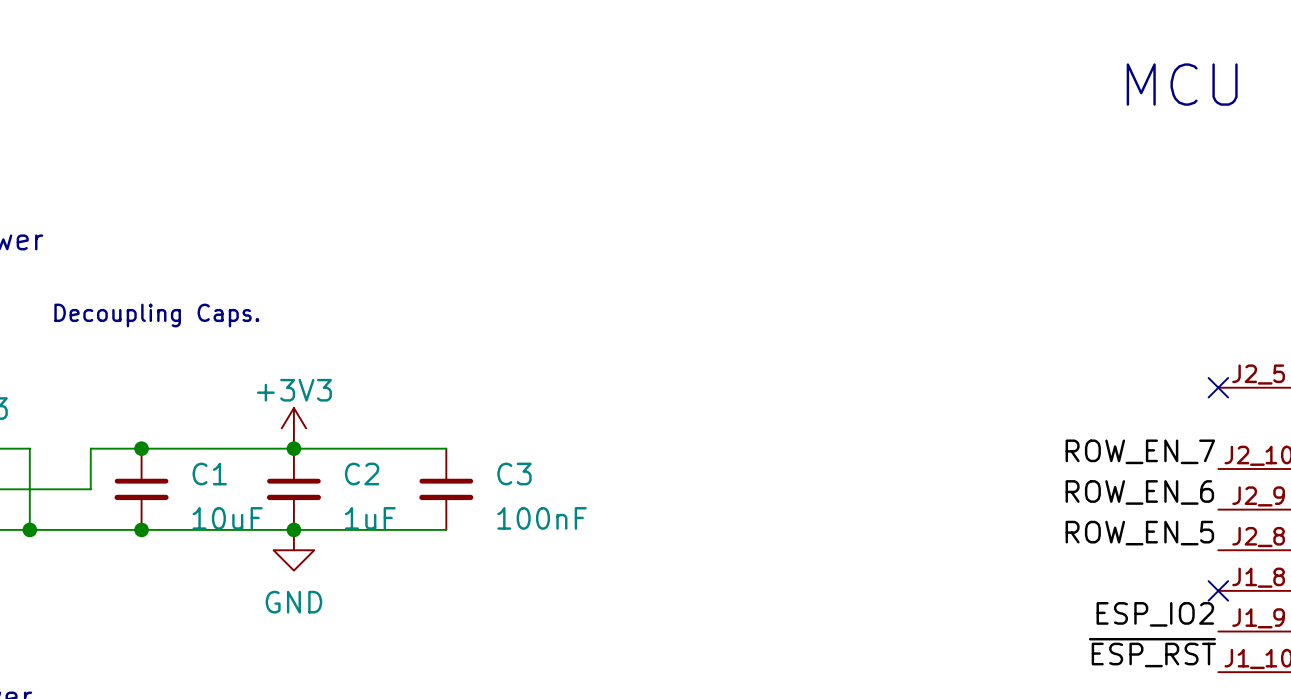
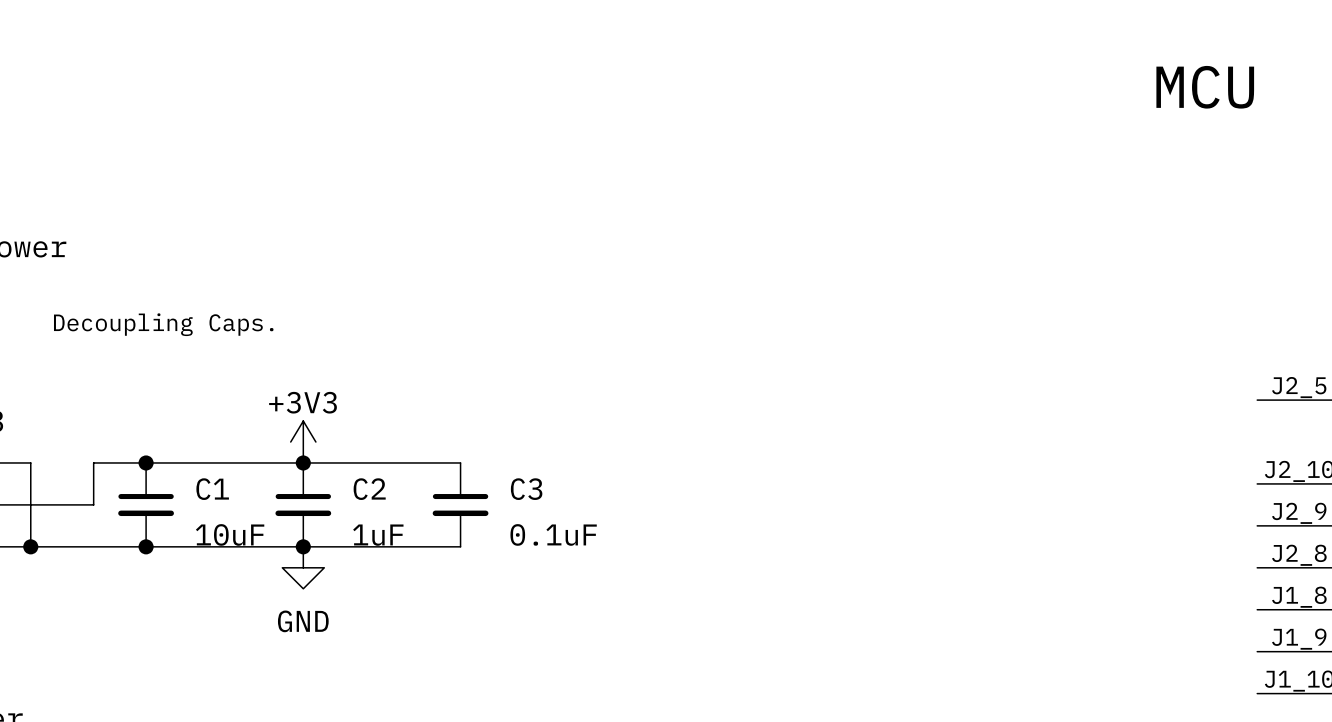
no-connect mark: (1218, 387) -> none
label: ROW_EN_7 (1140, 451) -> none
label: ROW_EN_6 (1139, 492) -> none
C3 value: 100nF (542, 518) -> 0.1uF (553, 534)
label: ROW_EN_5 (1139, 533) -> none
no-connect mark: (1218, 590) -> none
label: ESP_IO2 (1155, 614) -> none
label: ~{ESP_RST} (1152, 652) -> none

